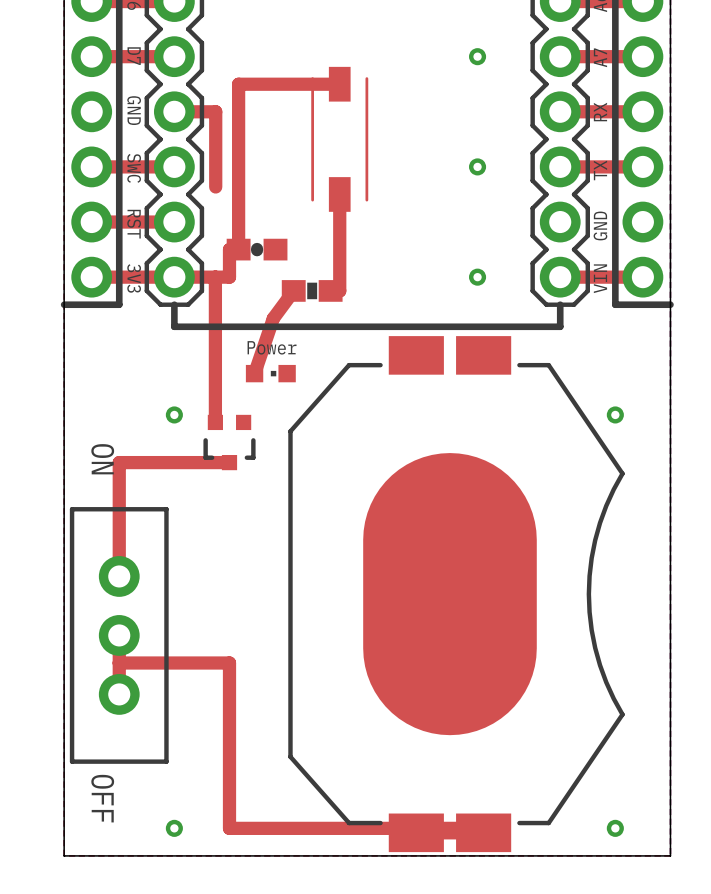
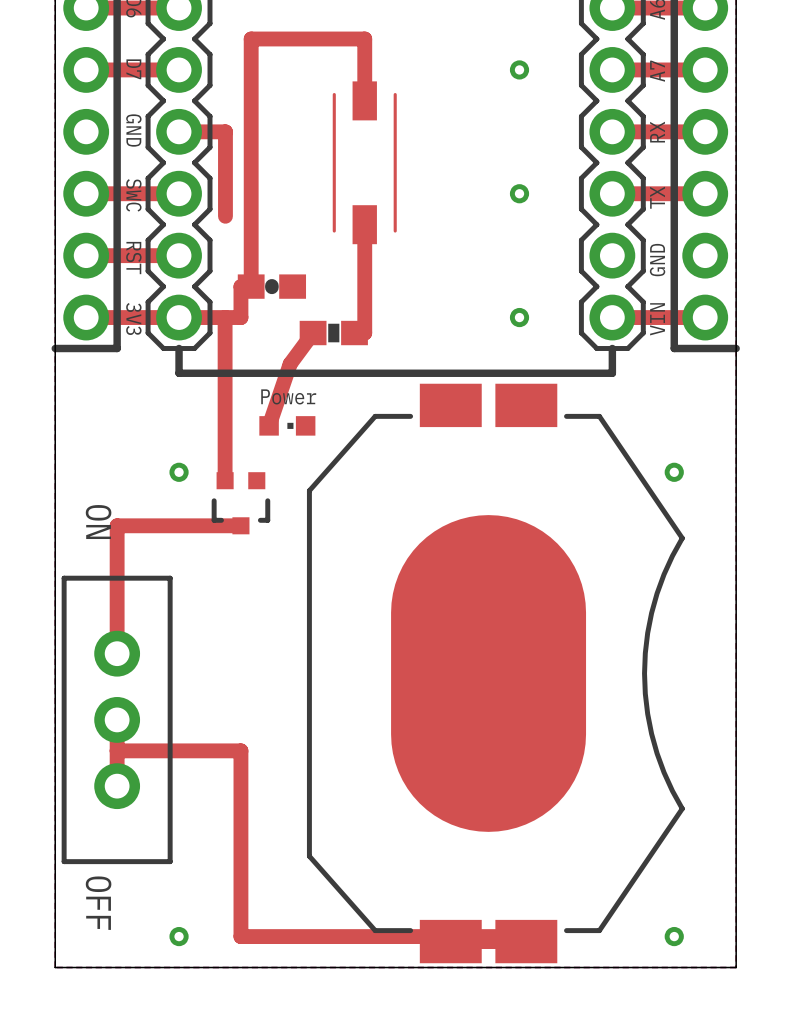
top track: (238, 84) (339, 84) -> (251, 100) (251, 38) (364, 38) (364, 100)

